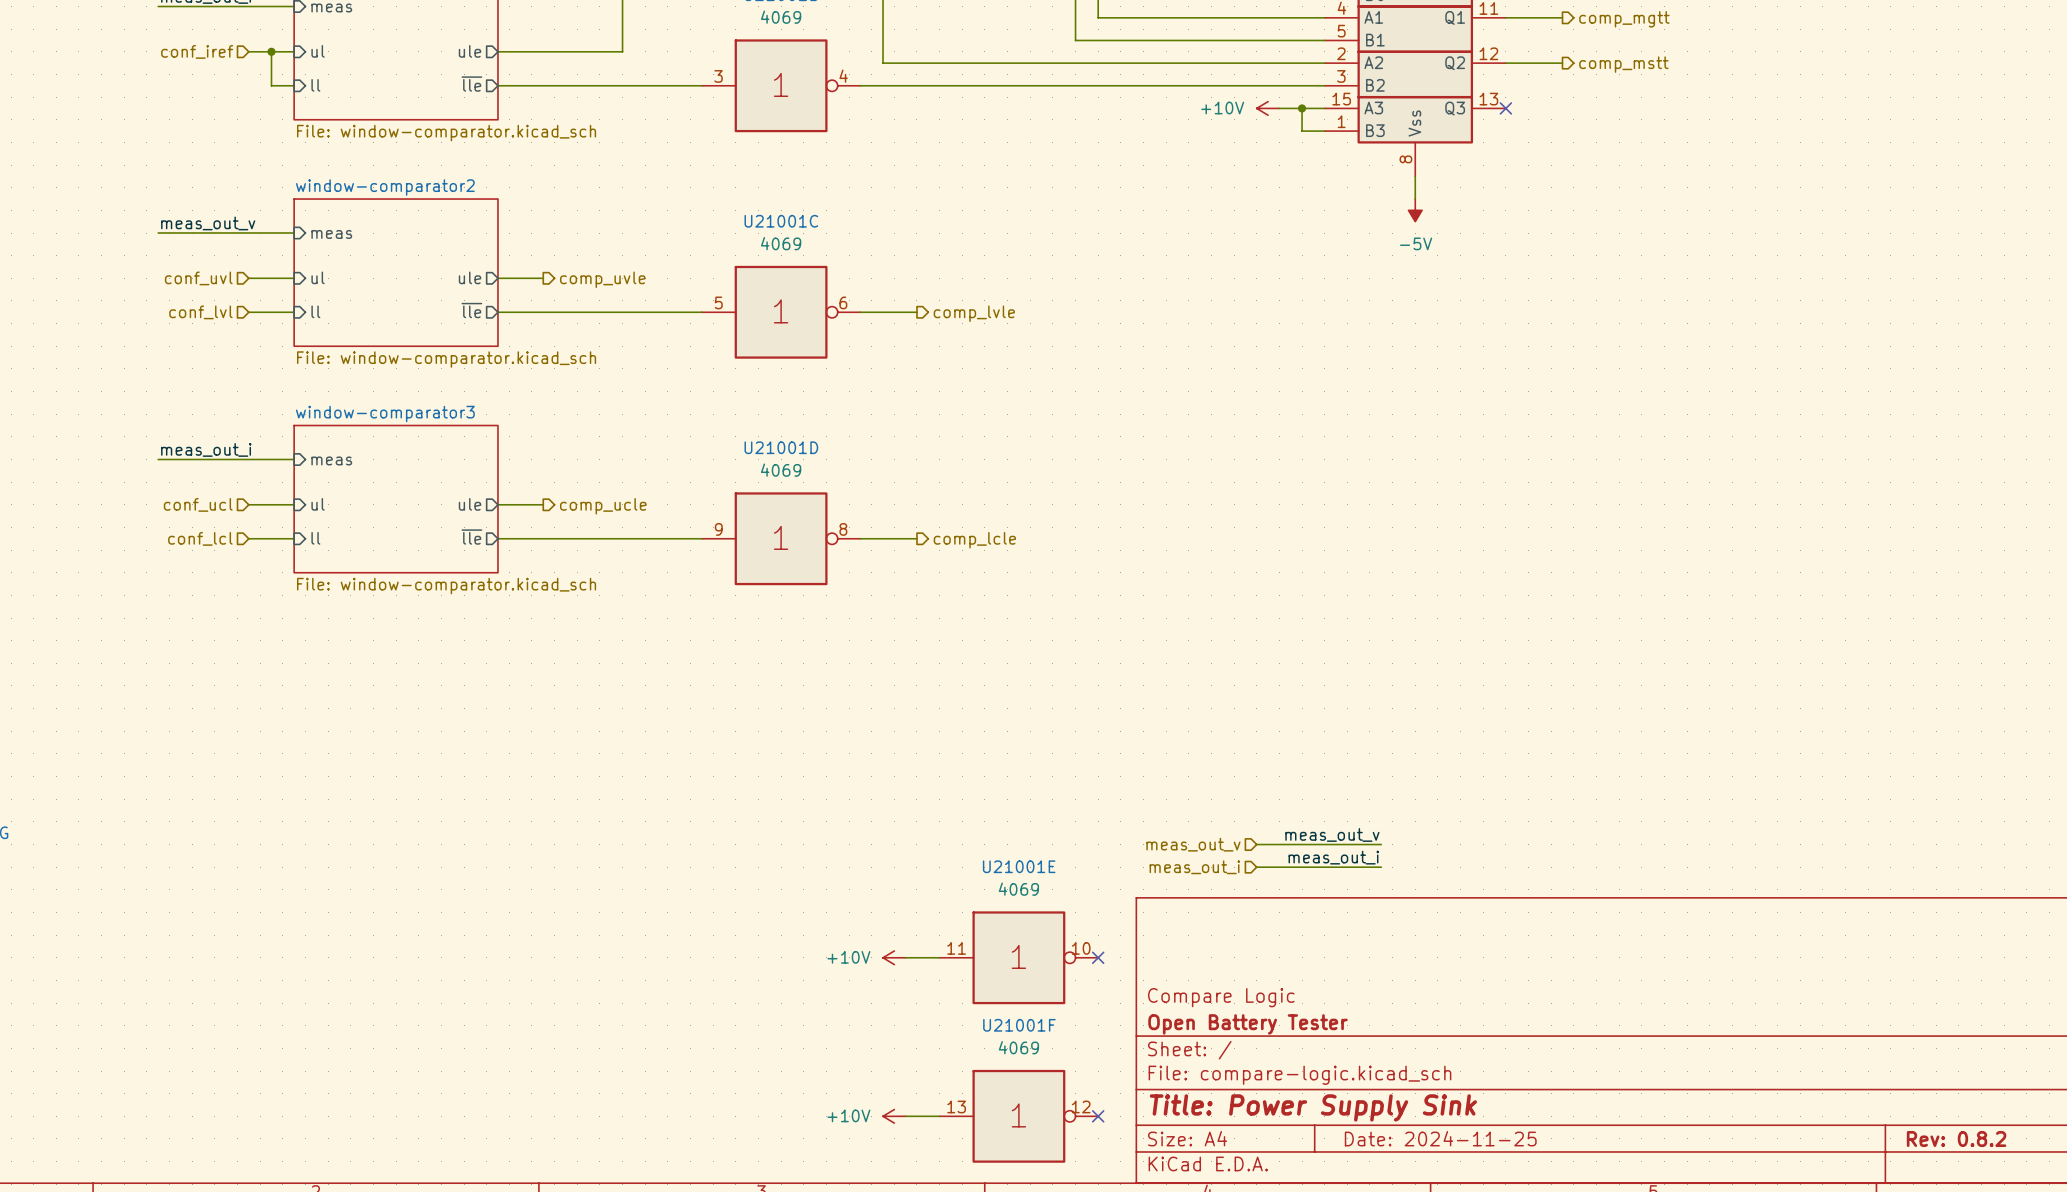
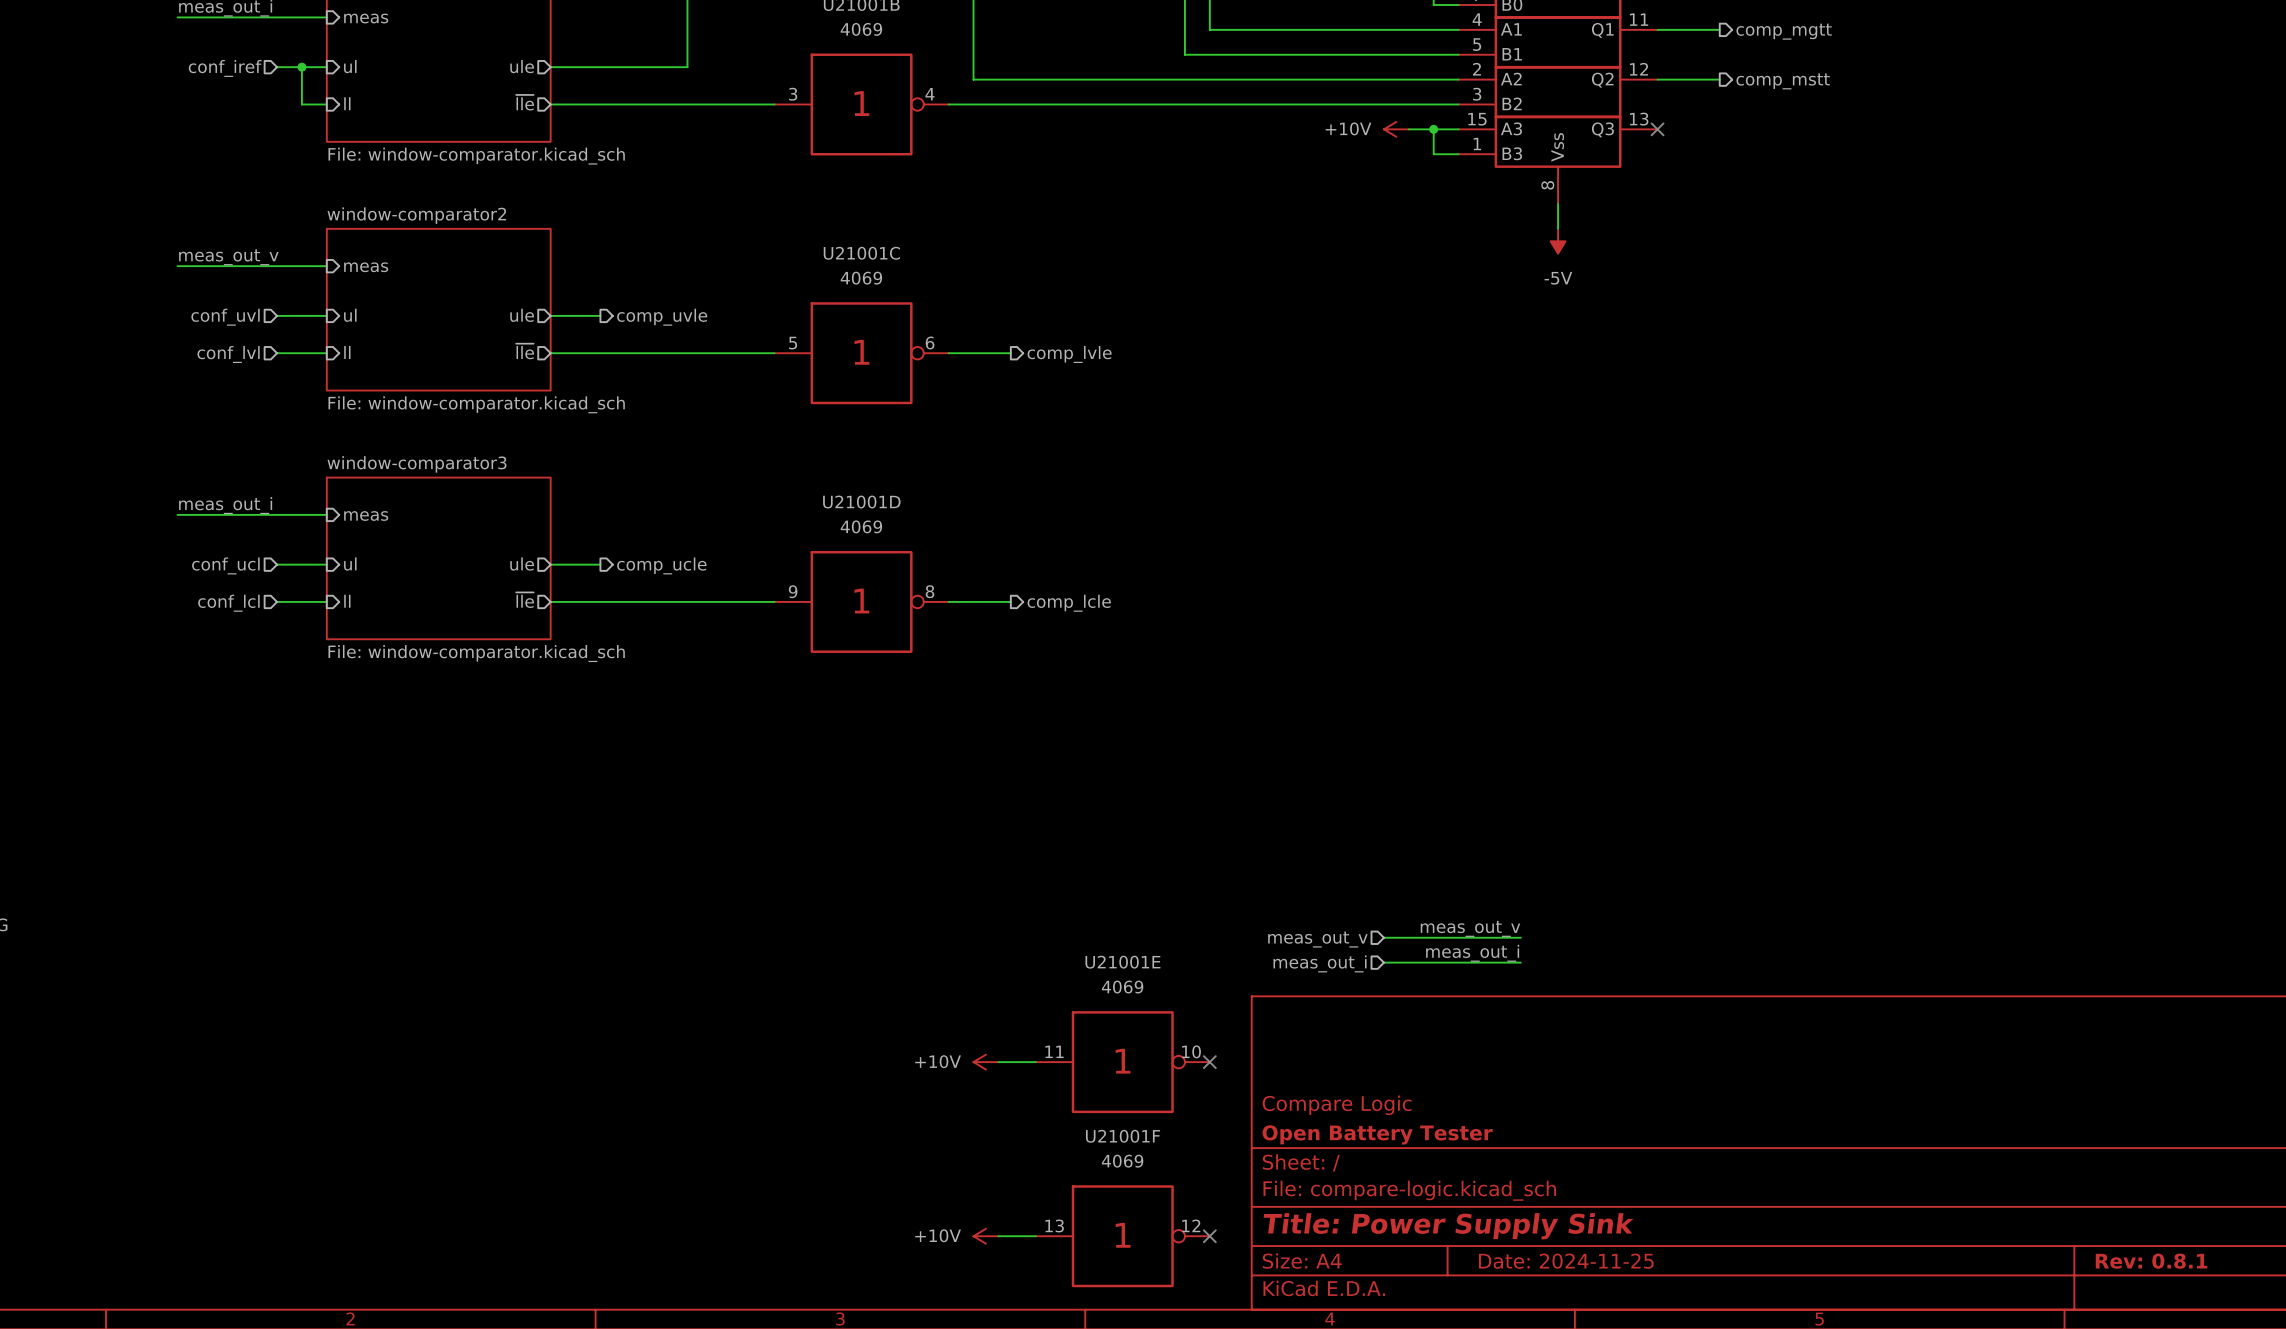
title block: Rev: 0.8.2 (1956, 1139) -> Rev: 0.8.1 (2151, 1261)

